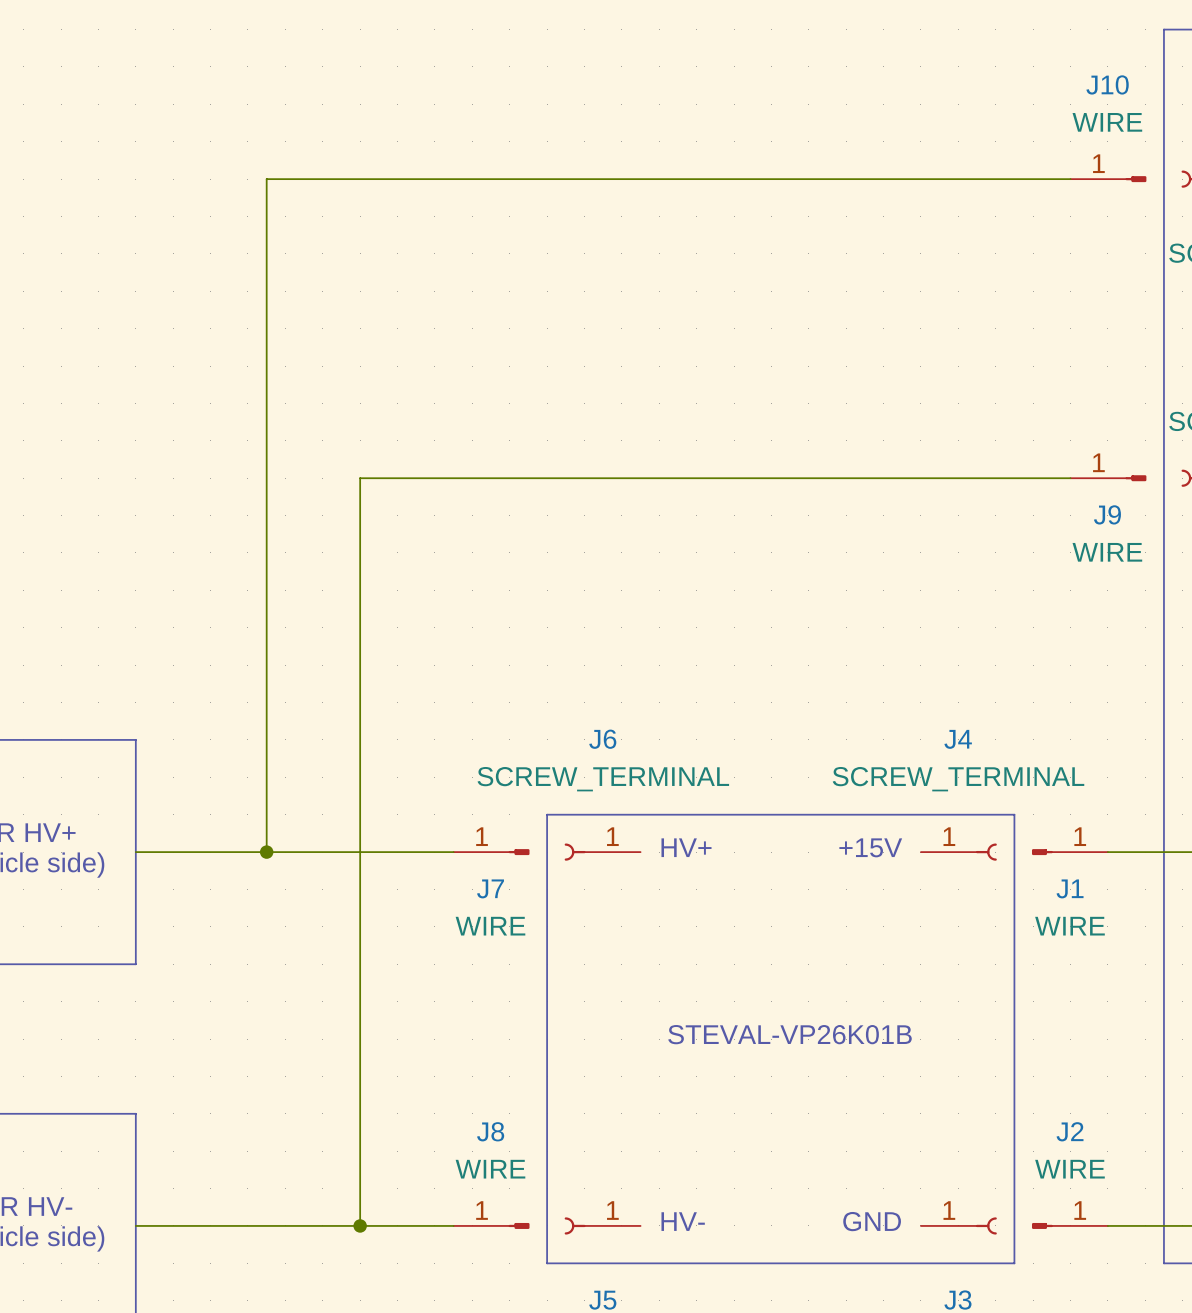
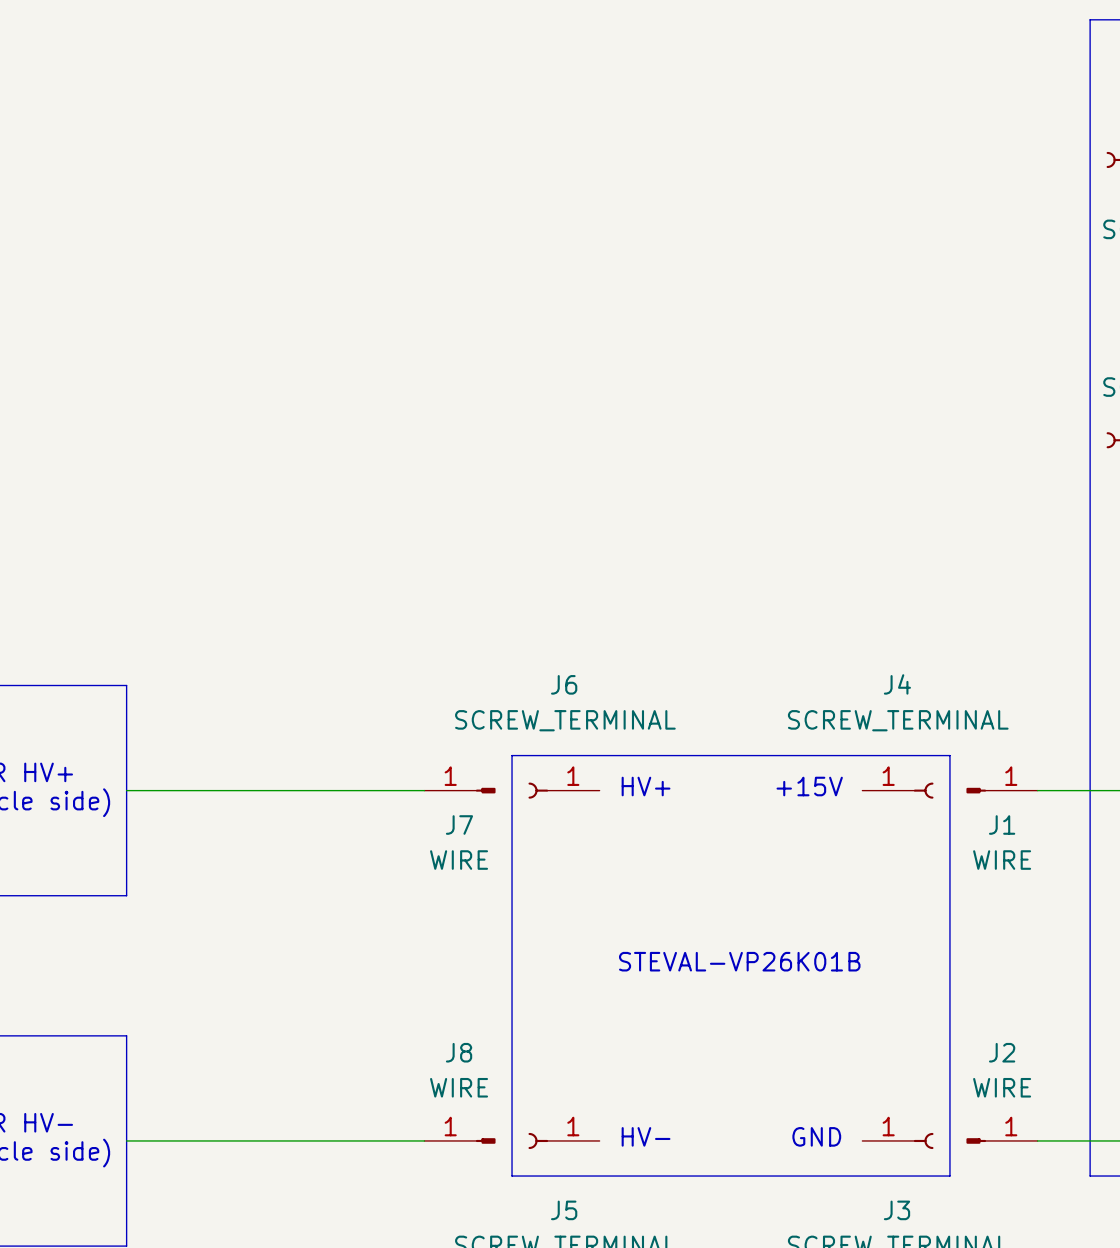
wire: (1070, 179) (266, 179) (266, 852) -> none
J10: WIRE (1108, 179) -> none
wire: (1070, 478) (360, 478) (360, 1225) -> none
J9: WIRE (1108, 478) -> none
junction: (266, 852) -> none
junction: (360, 1225) -> none

